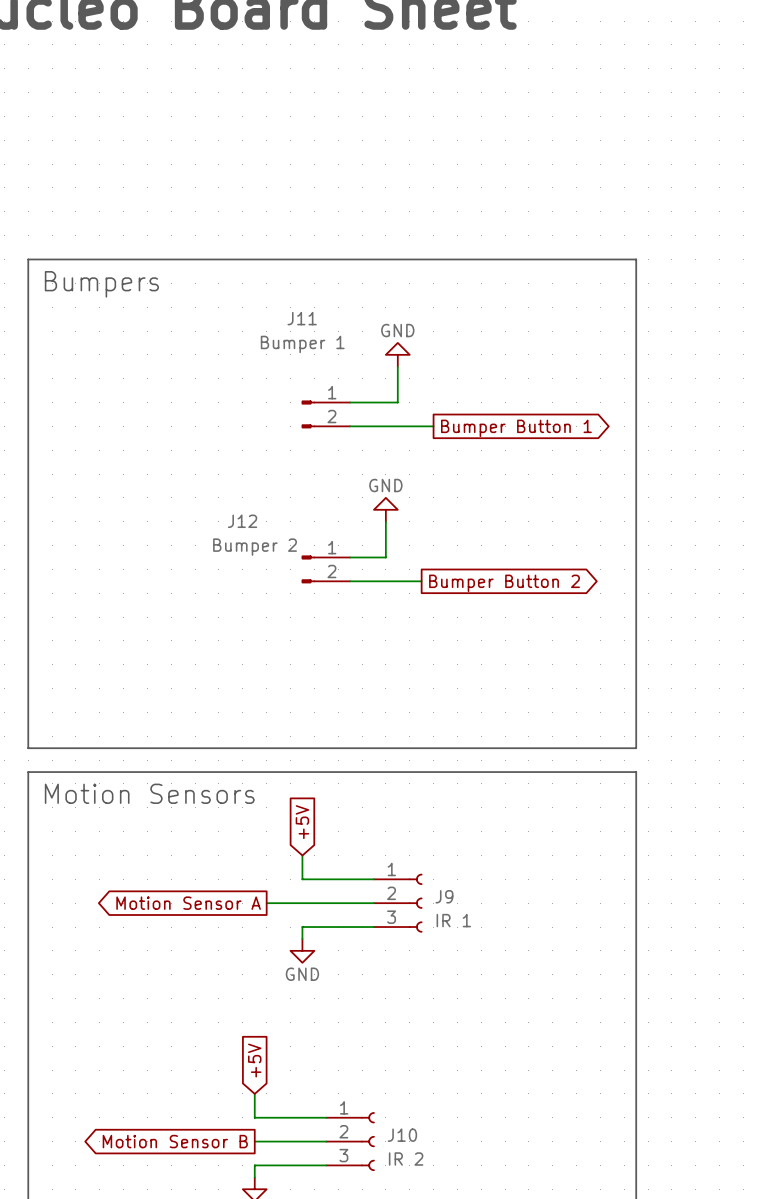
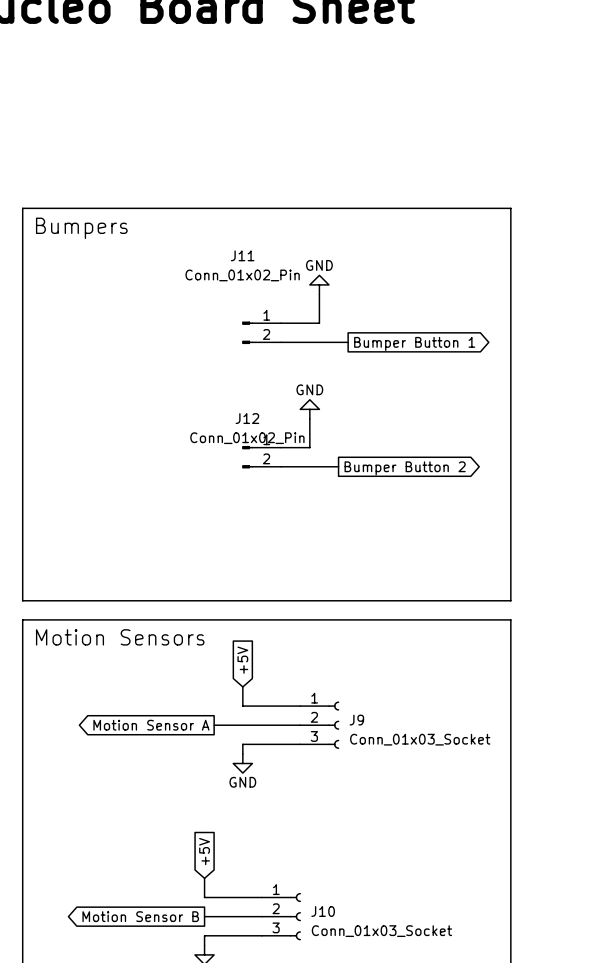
J11 value: Bumper 1 (302, 344) -> Conn_01x02_Pin (242, 275)
J12 name position: J12 (242, 521) -> J12 (247, 418)
J12 value: Bumper 2 (255, 547) -> Conn_01x02_Pin (247, 438)
J9 value: IR 1 (453, 920) -> Conn_01x03_Socket (420, 739)
J10 value: IR 2 (406, 1159) -> Conn_01x03_Socket (381, 931)

